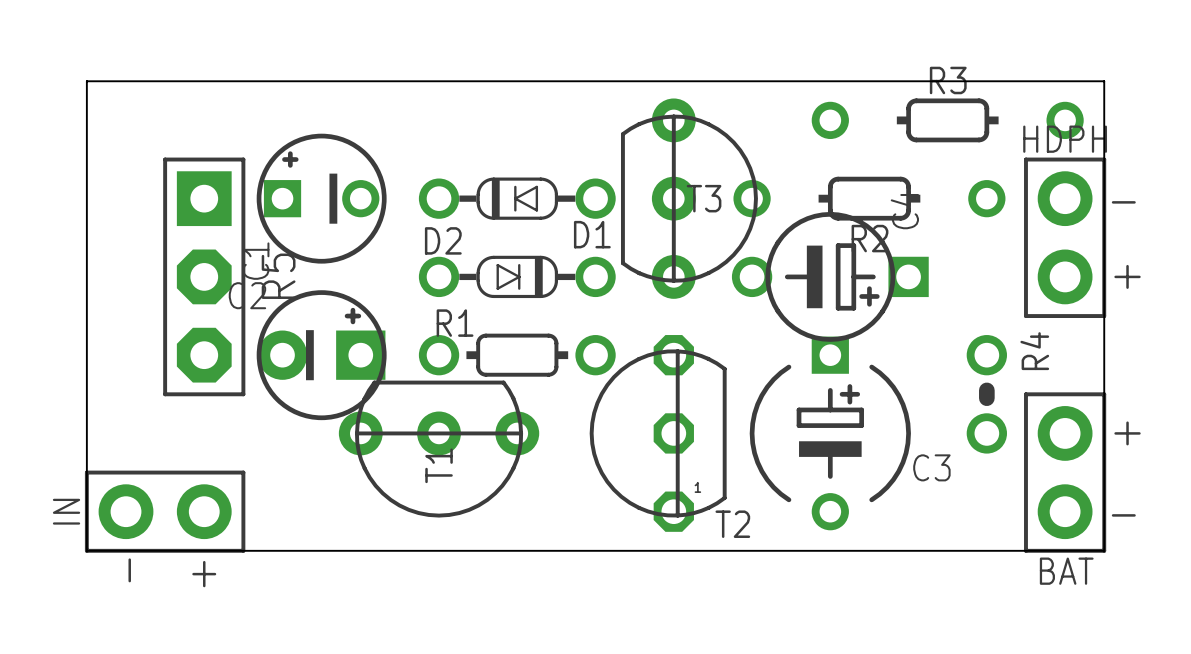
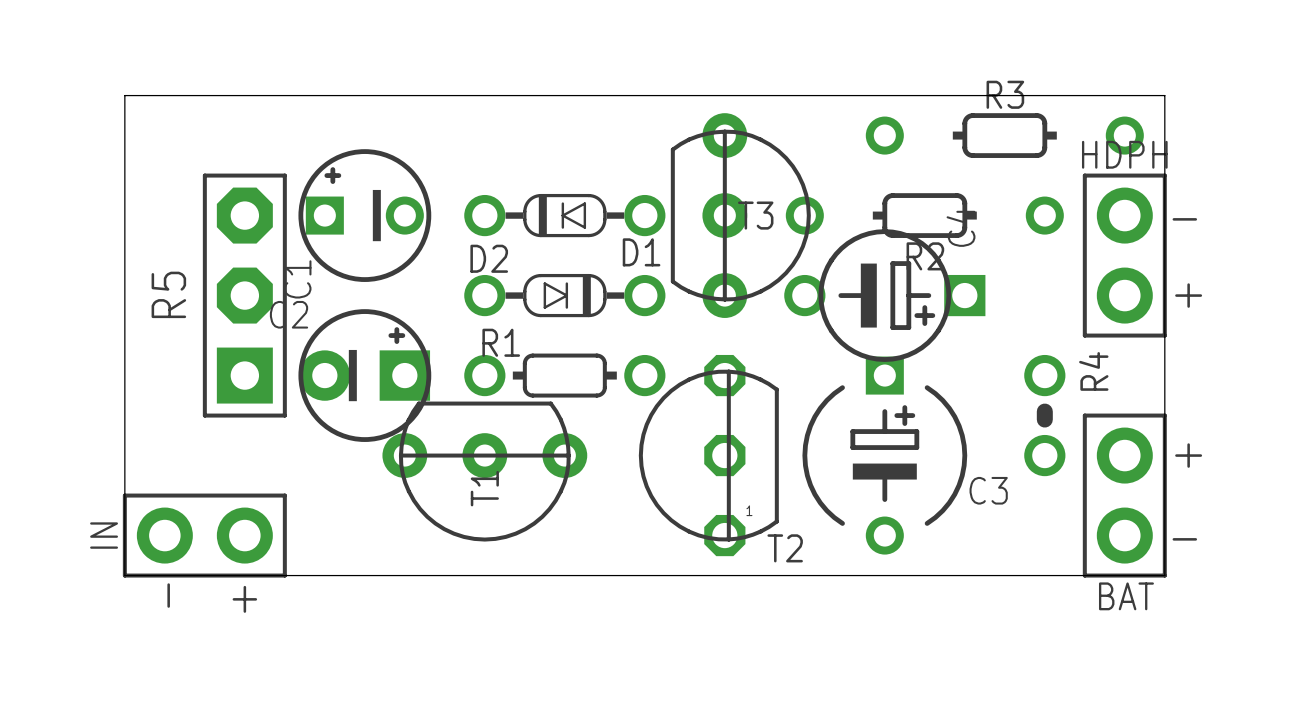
R5 rotation: 0° (204, 276) -> 180° (244, 295)

